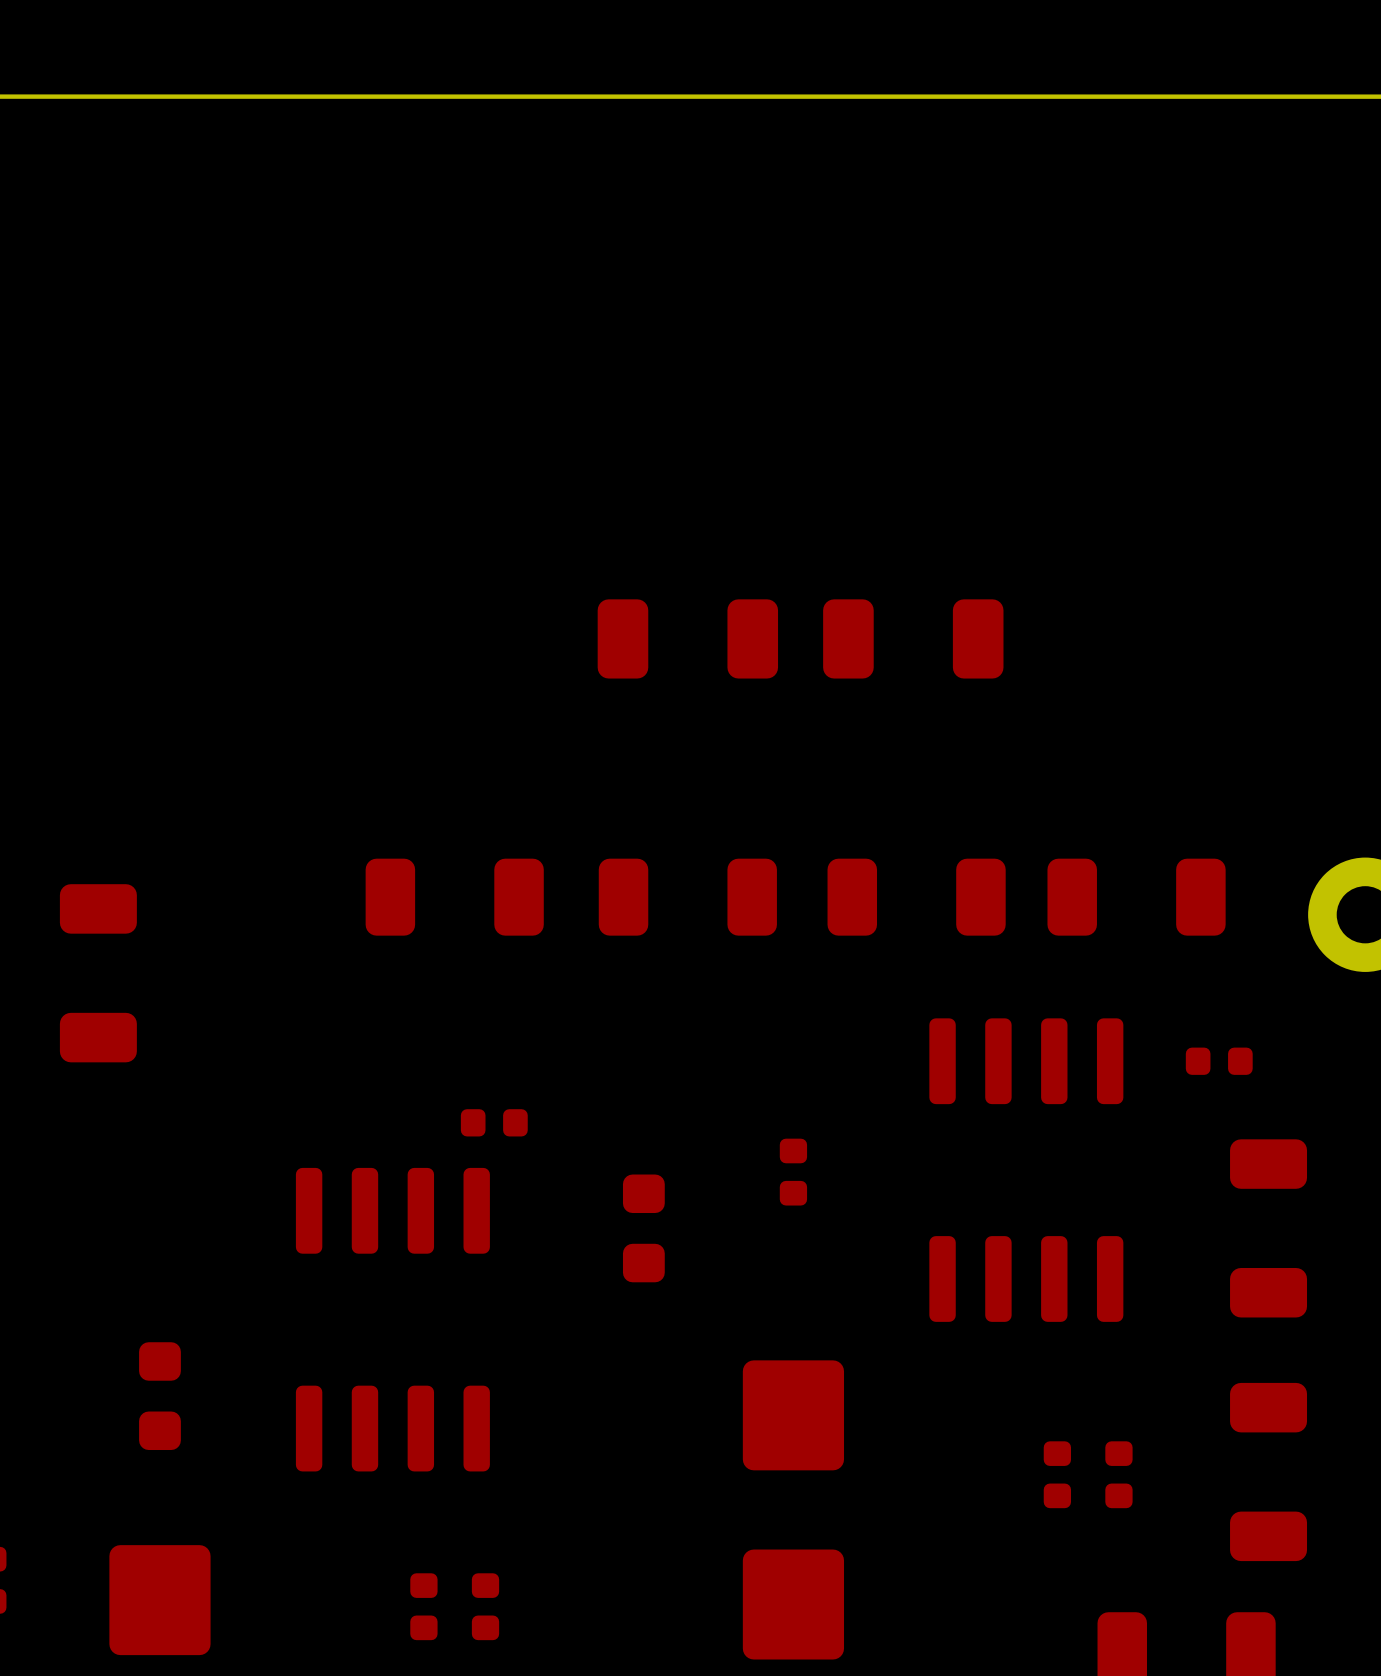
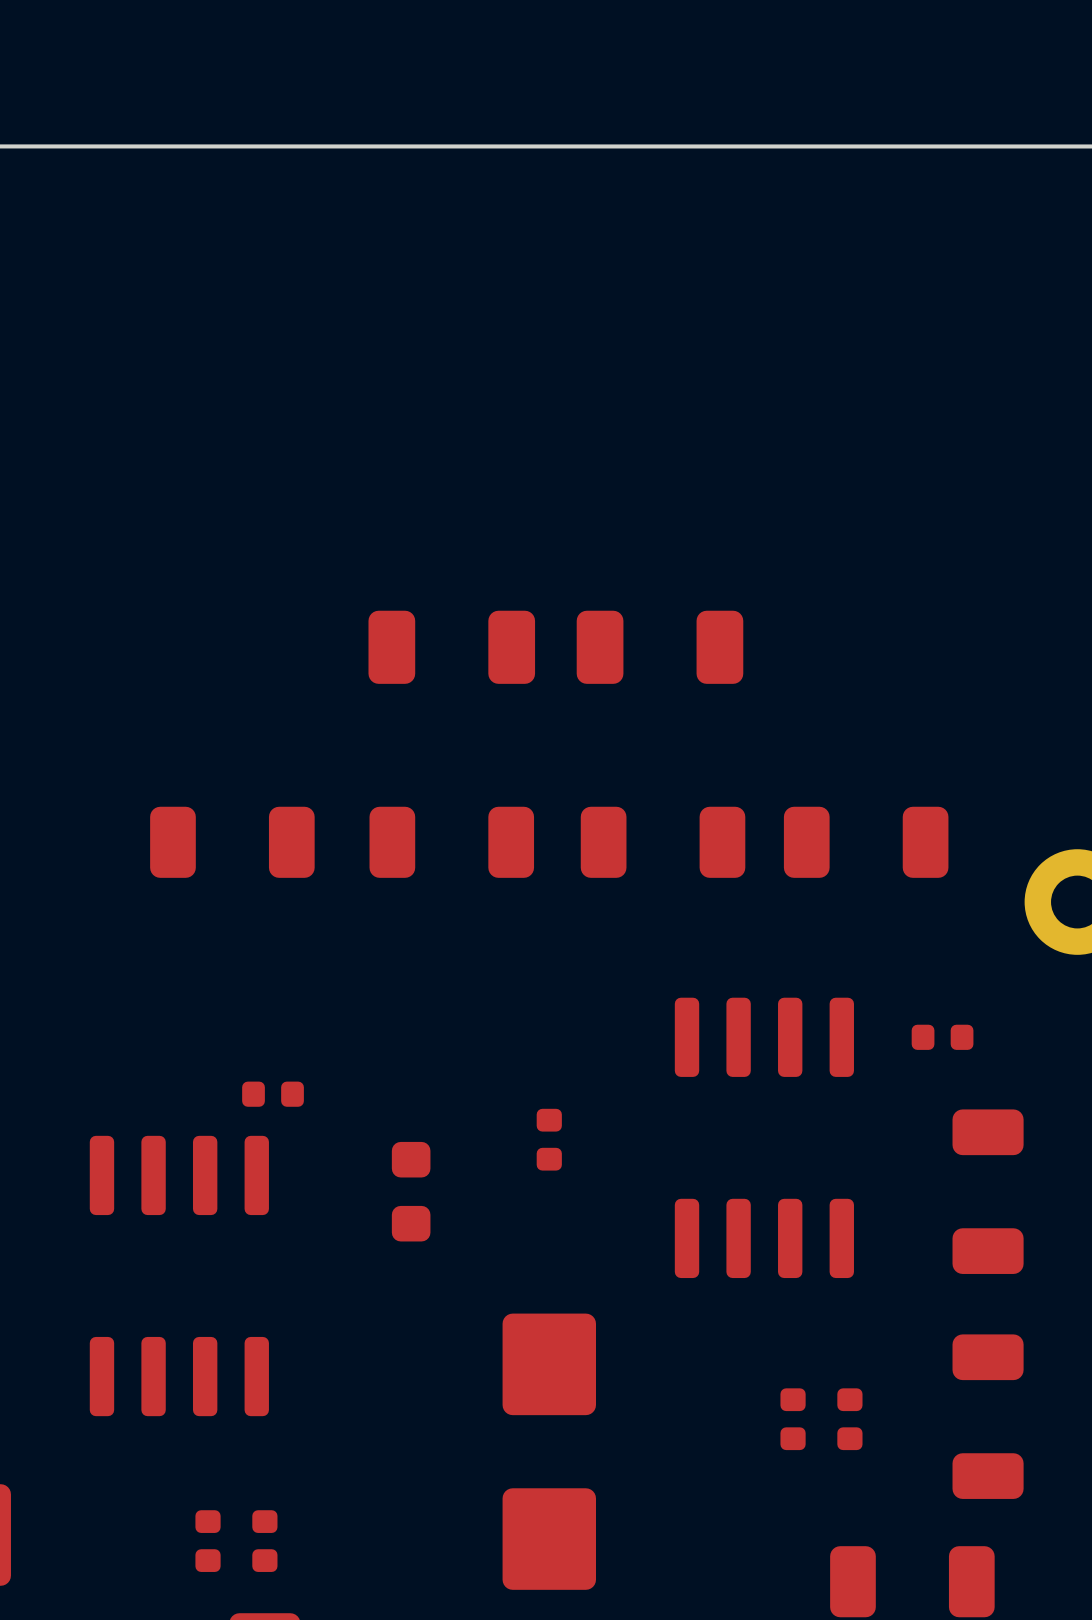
part position: (454, 897) -> (232, 842)
part position: (687, 897) -> (451, 842)
part position: (916, 897) -> (663, 842)
part position: (1136, 897) -> (866, 842)

